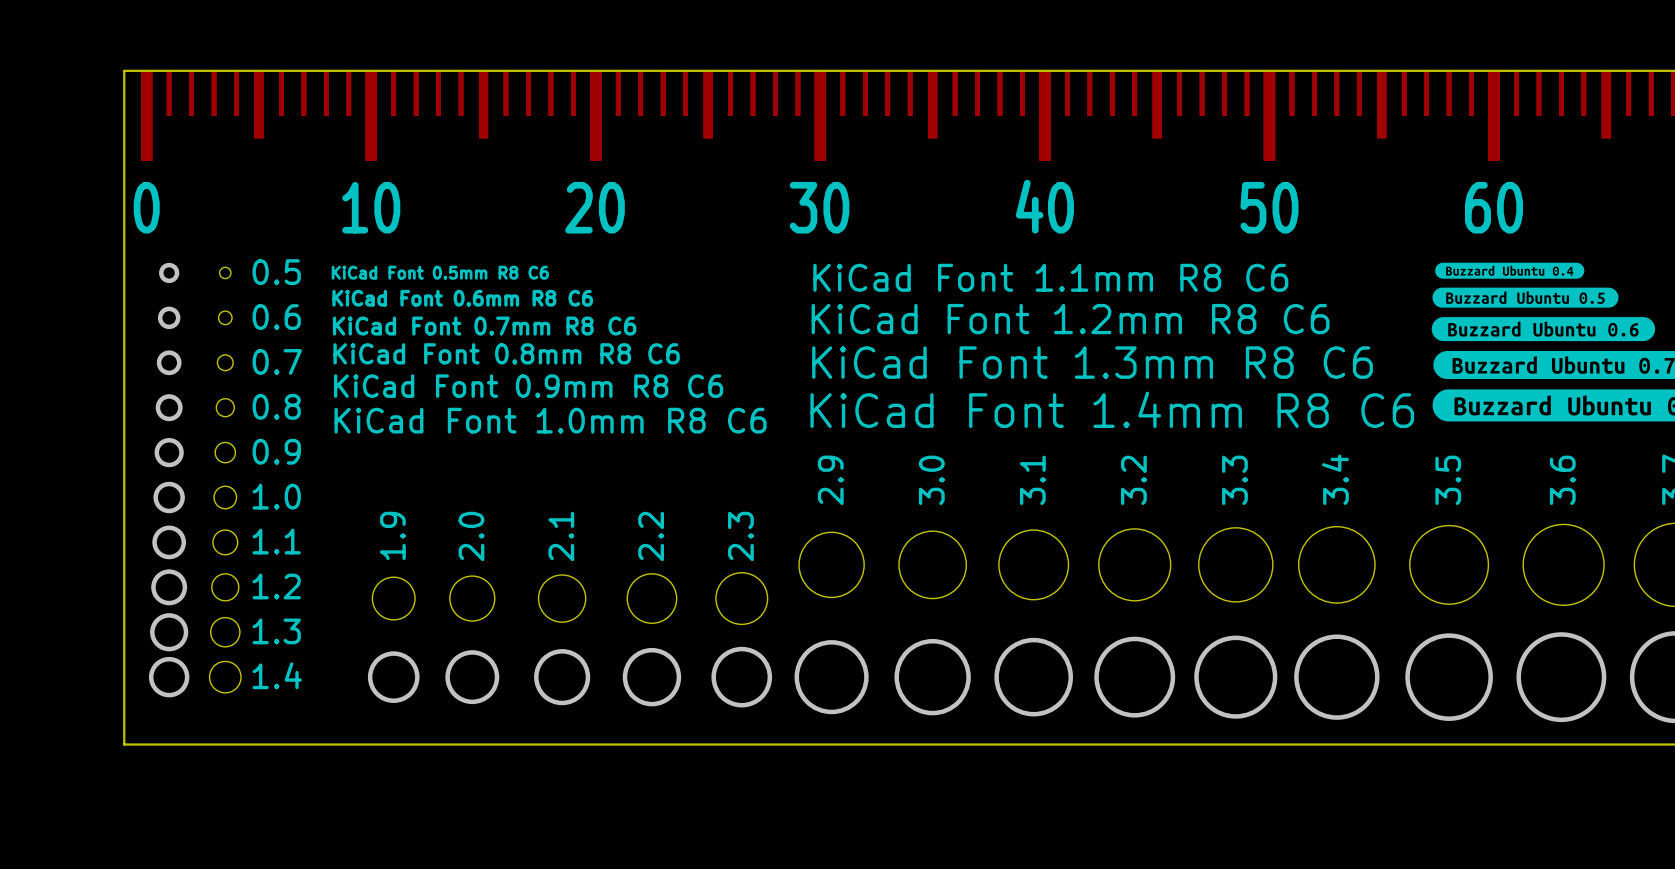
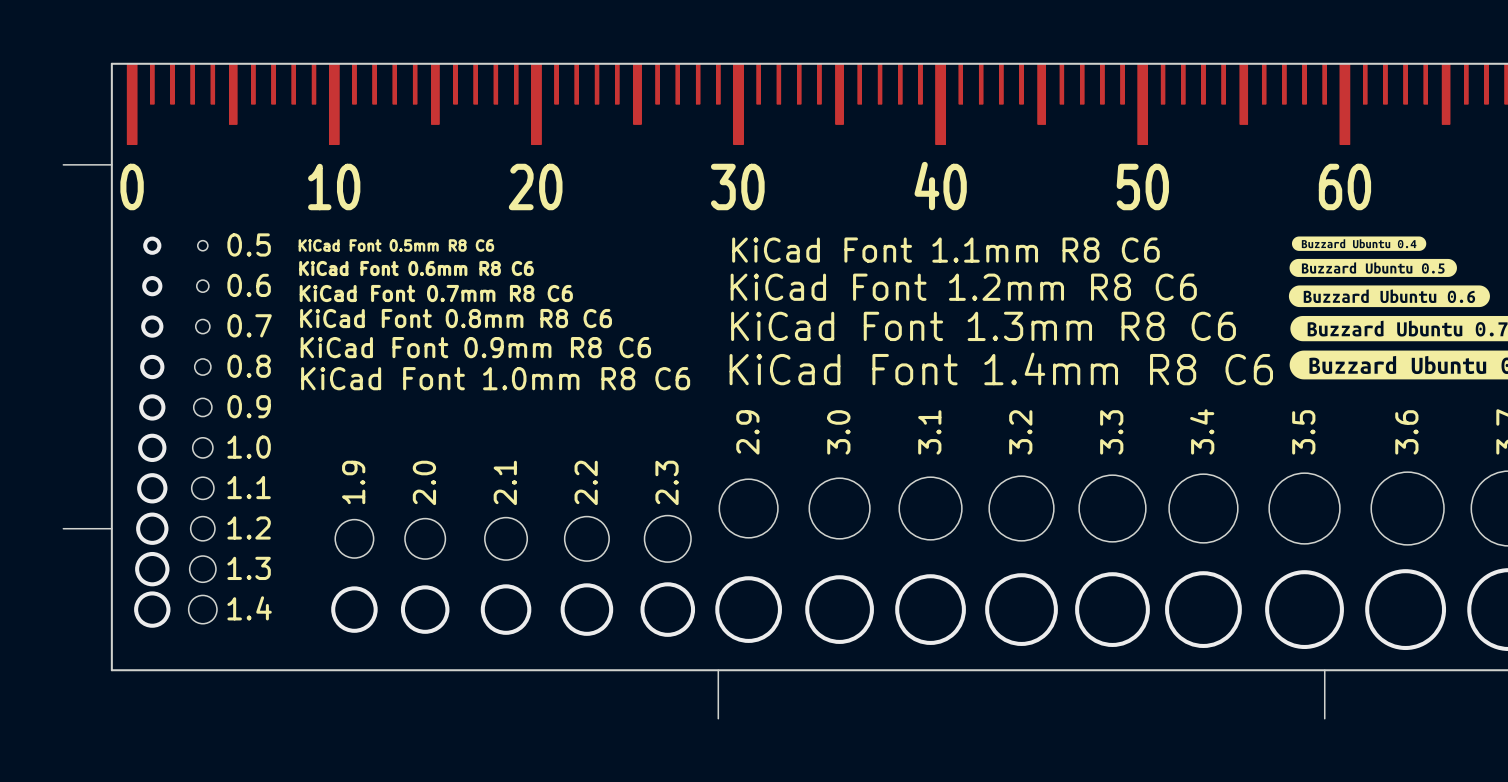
board edge: none -> (63, 164) (111, 164)
board edge: none -> (63, 528) (111, 528)
board edge: none -> (718, 670) (718, 718)
board edge: none -> (1324, 670) (1324, 718)

